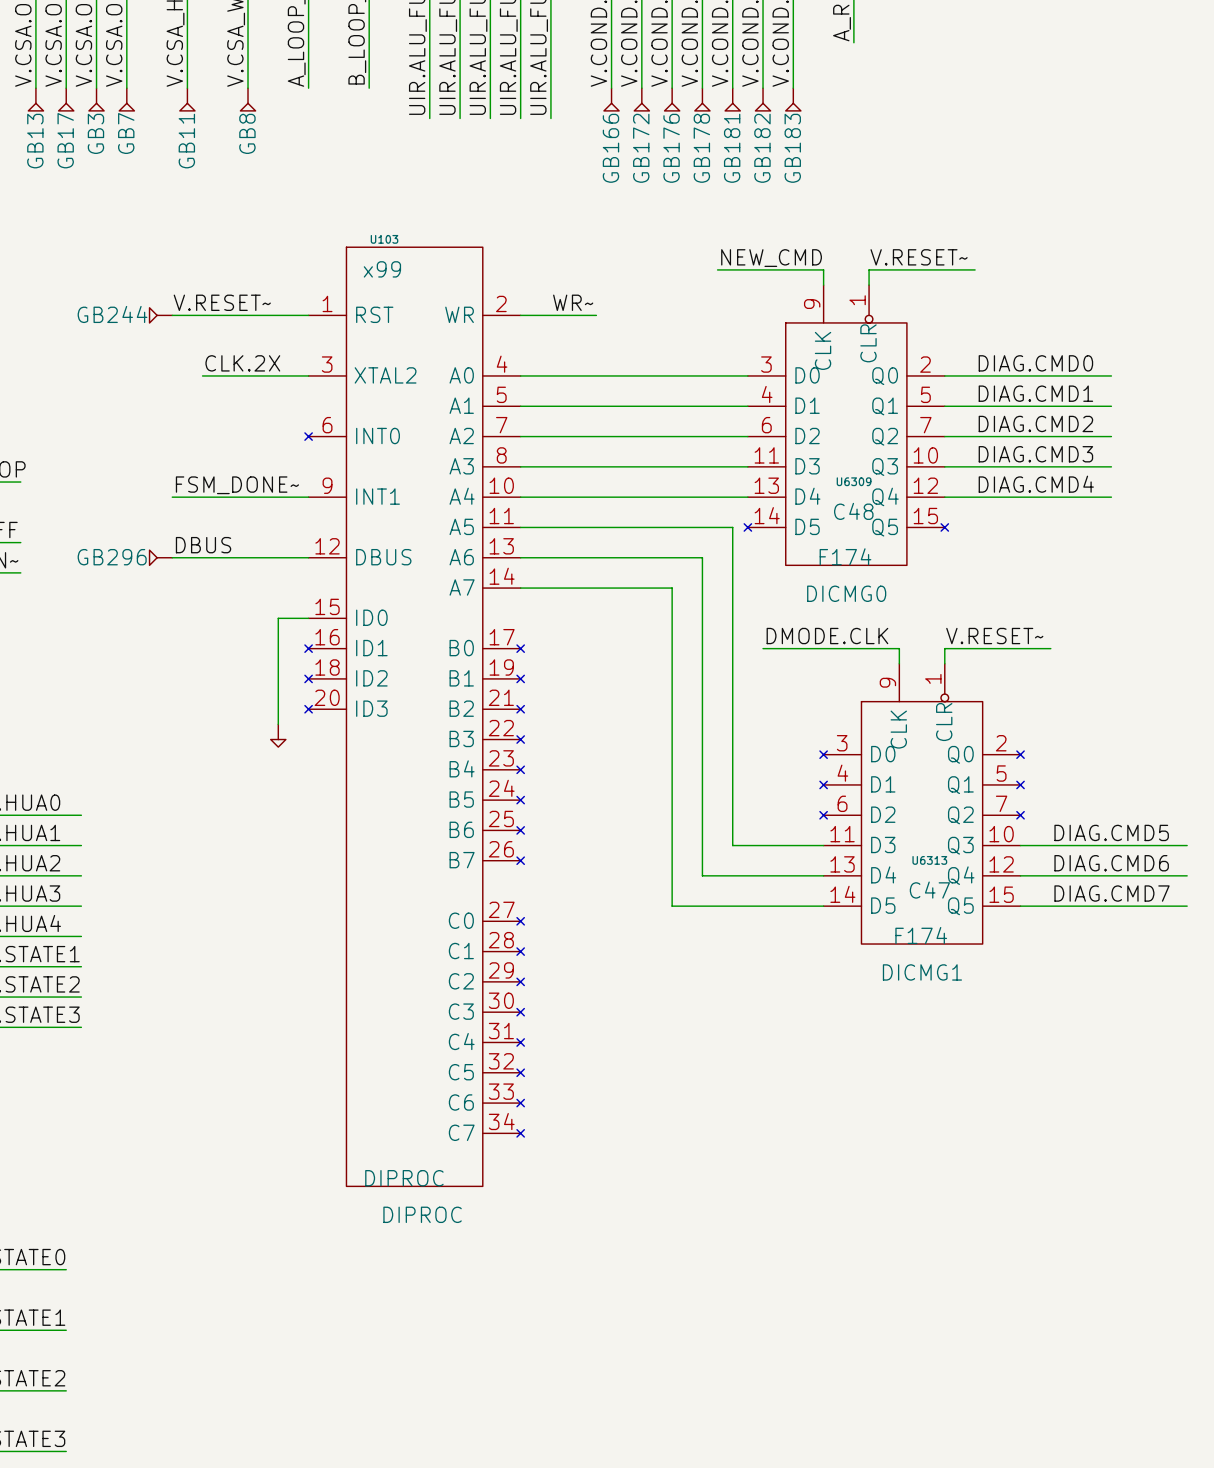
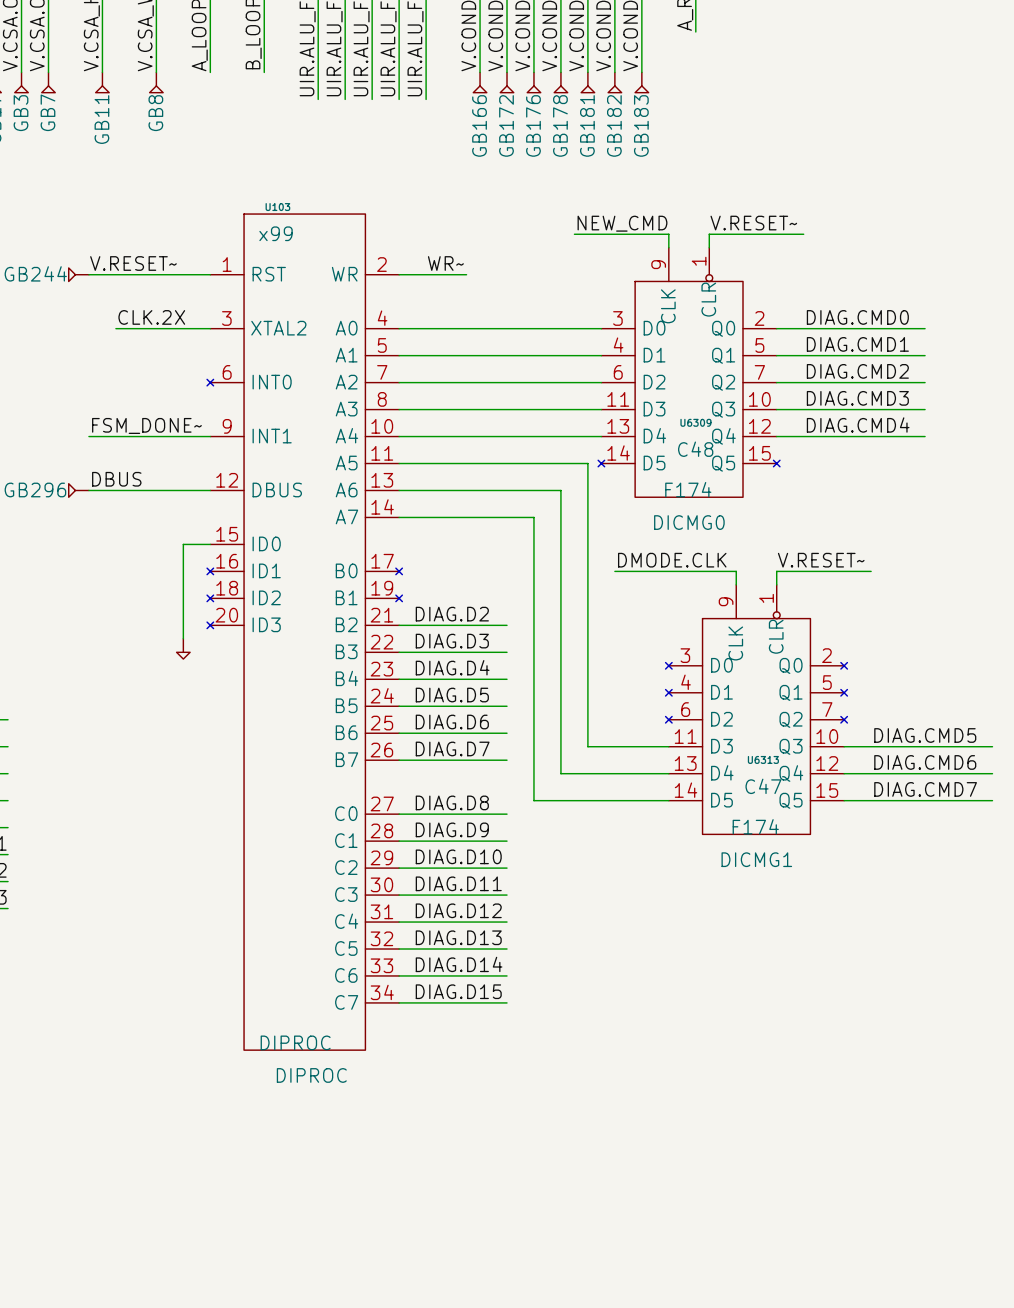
label: none -> DIAG.D2 (452, 614)
wire: none -> (399, 625) (507, 625)
no-connect mark: (520, 709) -> none
label: none -> DIAG.D3 (452, 641)
wire: none -> (399, 652) (507, 652)
no-connect mark: (520, 739) -> none
label: none -> DIAG.D4 (452, 667)
wire: none -> (399, 679) (507, 679)
no-connect mark: (520, 769) -> none
label: none -> DIAG.D5 (452, 695)
wire: none -> (399, 706) (507, 706)
no-connect mark: (520, 800) -> none
label: none -> DIAG.D6 (452, 722)
wire: none -> (399, 733) (507, 733)
no-connect mark: (520, 830) -> none
label: none -> DIAG.D7 (452, 748)
wire: none -> (399, 760) (507, 760)
no-connect mark: (520, 860) -> none
label: none -> DIAG.D8 (452, 802)
wire: none -> (399, 814) (507, 814)
no-connect mark: (520, 921) -> none
label: none -> DIAG.D9 (452, 829)
wire: none -> (399, 841) (507, 841)
no-connect mark: (520, 951) -> none
label: none -> DIAG.D10 (458, 856)
wire: none -> (399, 868) (507, 868)
no-connect mark: (520, 981) -> none
label: none -> DIAG.D11 (458, 883)
wire: none -> (399, 895) (507, 895)
no-connect mark: (520, 1012) -> none
label: none -> DIAG.D12 (458, 910)
wire: none -> (399, 922) (507, 922)
no-connect mark: (520, 1042) -> none
label: none -> DIAG.D13 (458, 937)
wire: none -> (399, 949) (507, 949)
no-connect mark: (520, 1072) -> none
label: none -> DIAG.D14 (459, 964)
wire: none -> (399, 975) (507, 975)
no-connect mark: (520, 1103) -> none
label: none -> DIAG.D15 (458, 991)
wire: none -> (399, 1002) (507, 1002)
no-connect mark: (520, 1133) -> none

